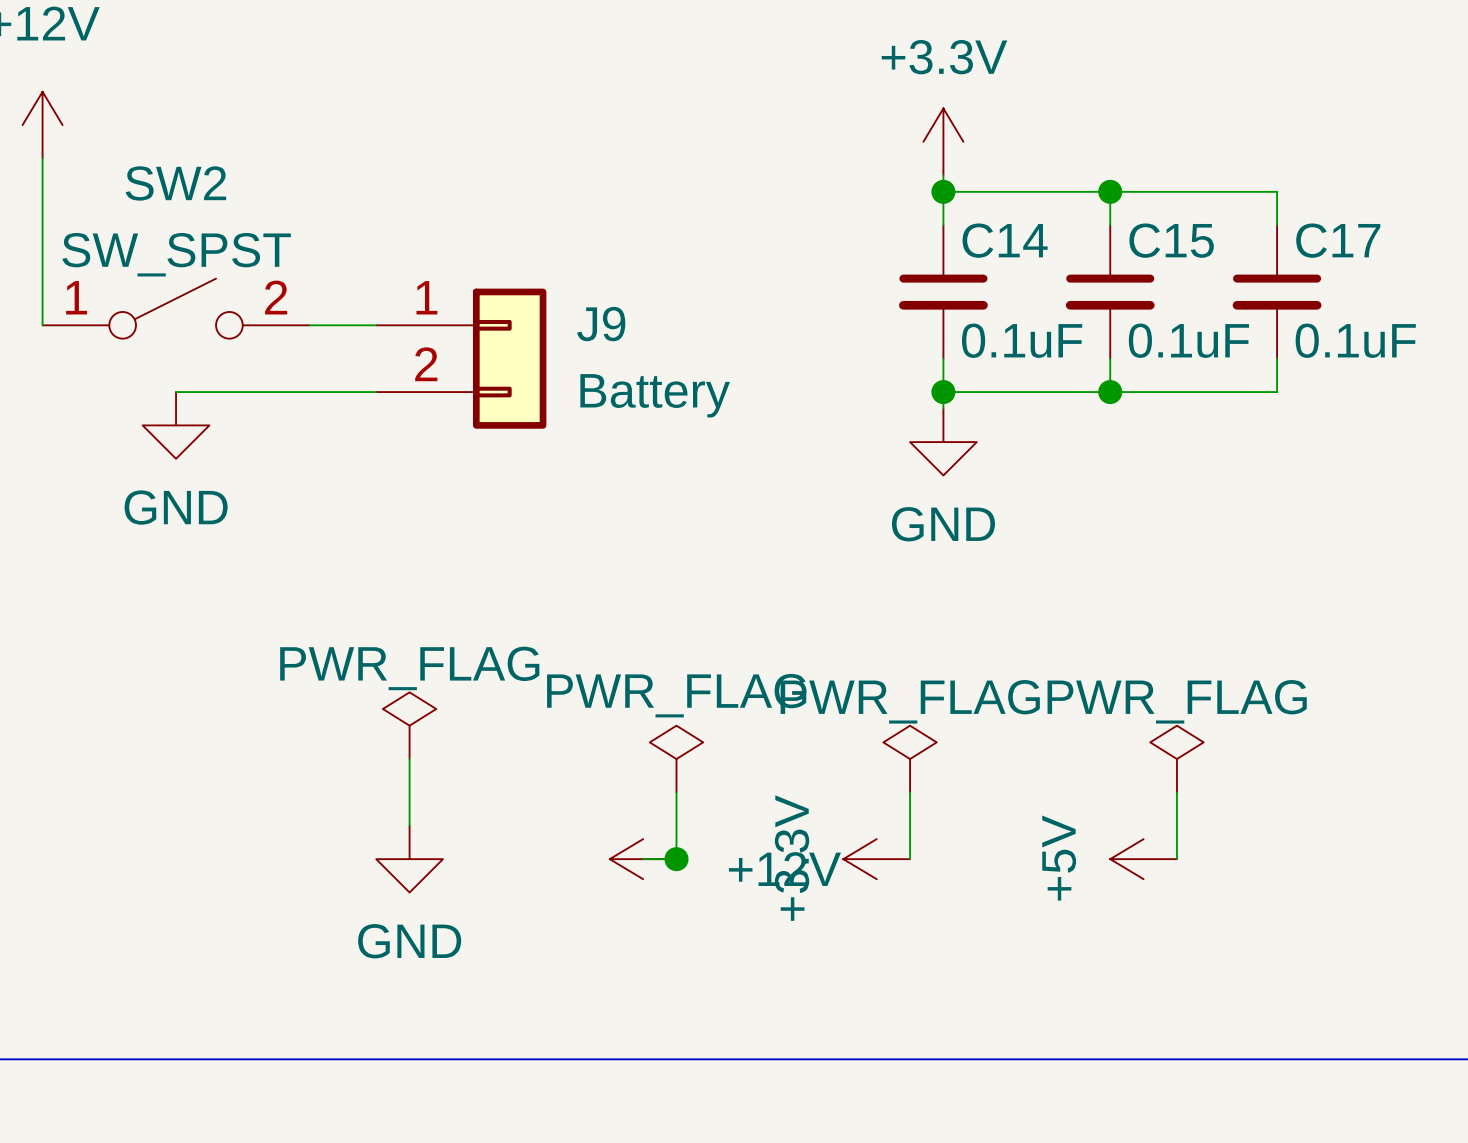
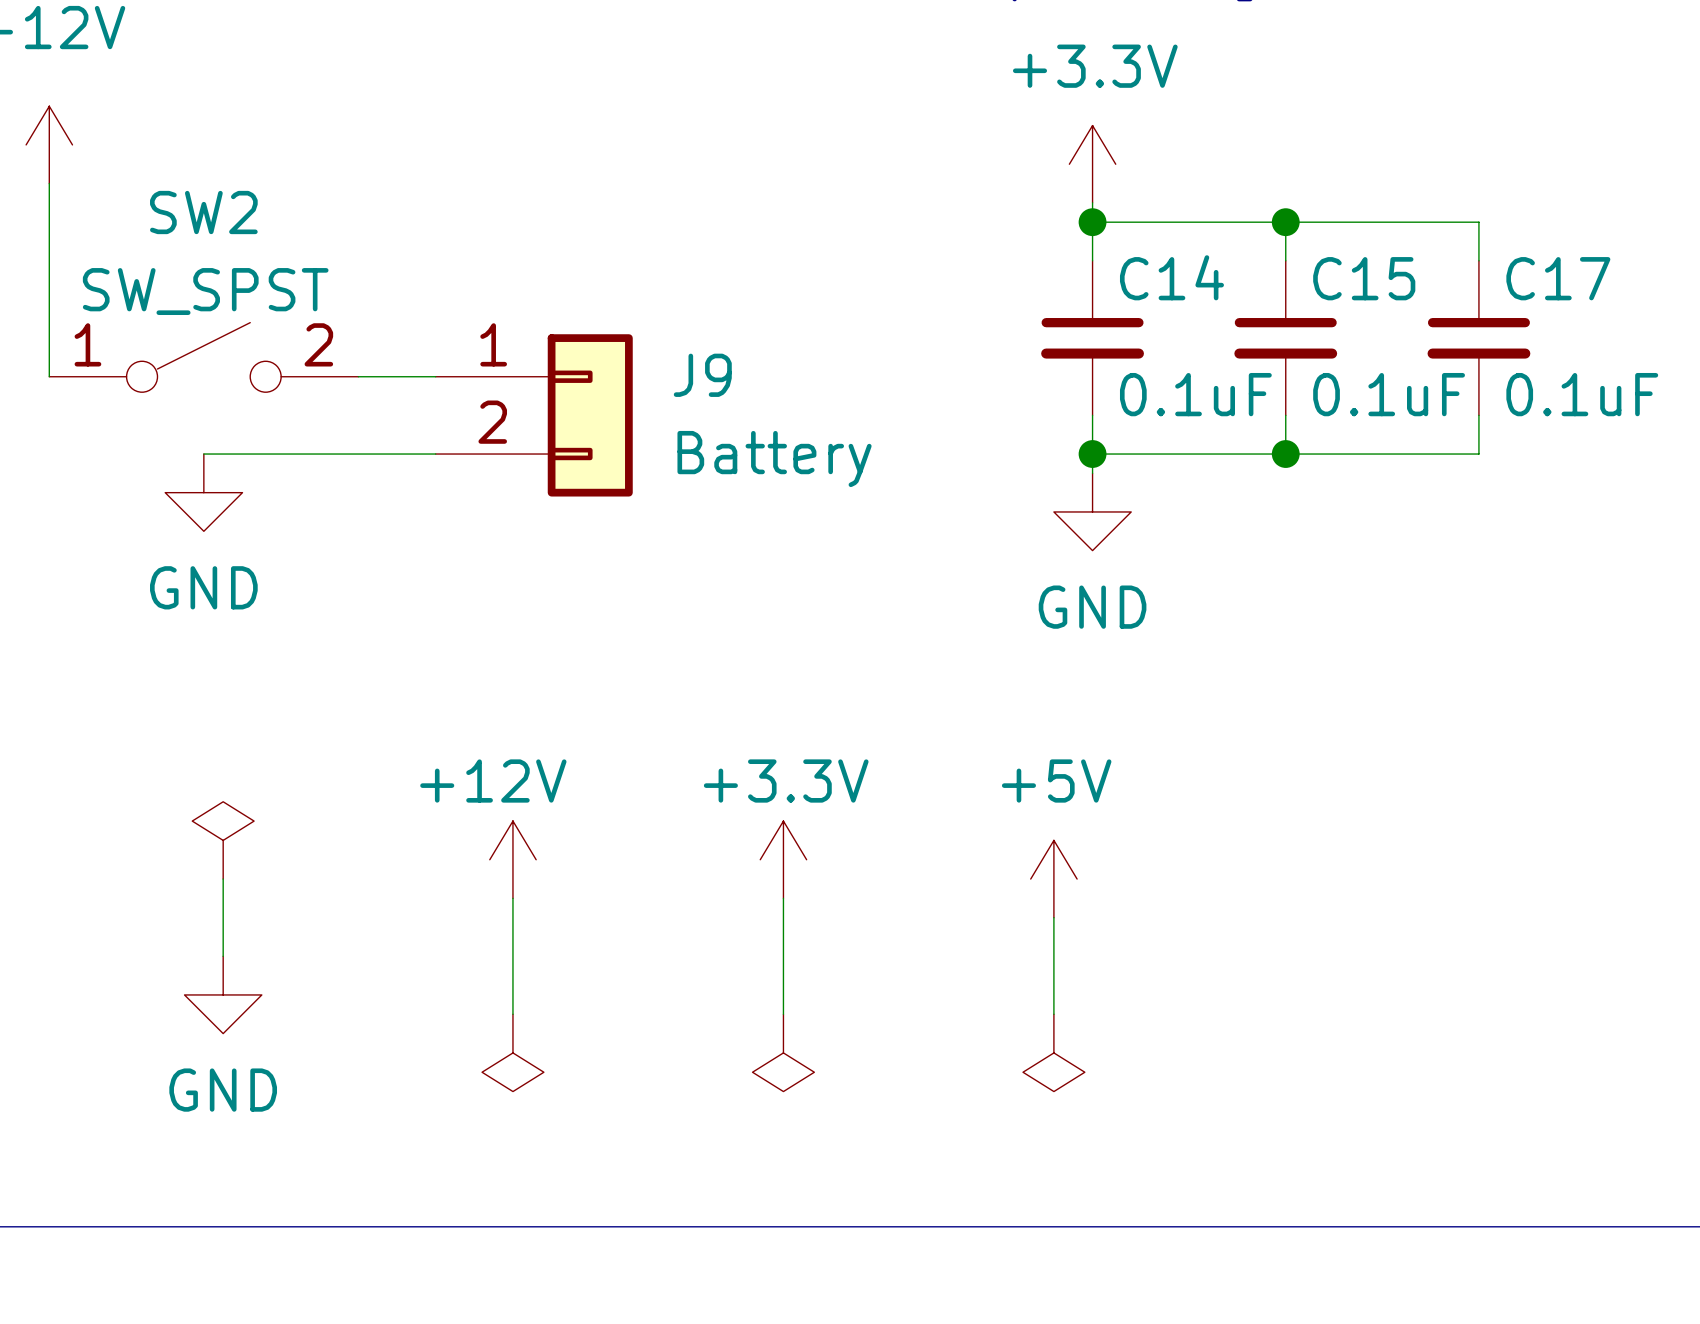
power symbol: none -> (223, 840)
power symbol: PWR_FLAG (409, 725) -> none
wire: (409, 759) (409, 825) -> (223, 879) (223, 956)
power symbol: PWR_FLAG (676, 759) -> +3.3V (783, 859)
power symbol: PWR_FLAG (910, 759) -> +5V (1053, 879)
power symbol: PWR_FLAG (1176, 759) -> none
wire: none -> (512, 898) (512, 1014)
wire: (1176, 792) (1176, 859) -> none
power symbol position: GND (409, 859) -> GND (223, 994)
power symbol rotation: 0° (643, 859) -> 90° clockwise (512, 859)
power symbol position: +12V (643, 859) -> +12V (512, 859)
junction: (676, 859) -> none
power symbol: +3.3V (876, 859) -> none
wire: none -> (1053, 994) (1053, 1014)
power symbol: +5V (1143, 859) -> none
power symbol text position: +12V (784, 869) -> +12V (493, 781)
power symbol: none -> (512, 1052)
power symbol: none -> (783, 1052)
power symbol: none -> (1053, 1052)

